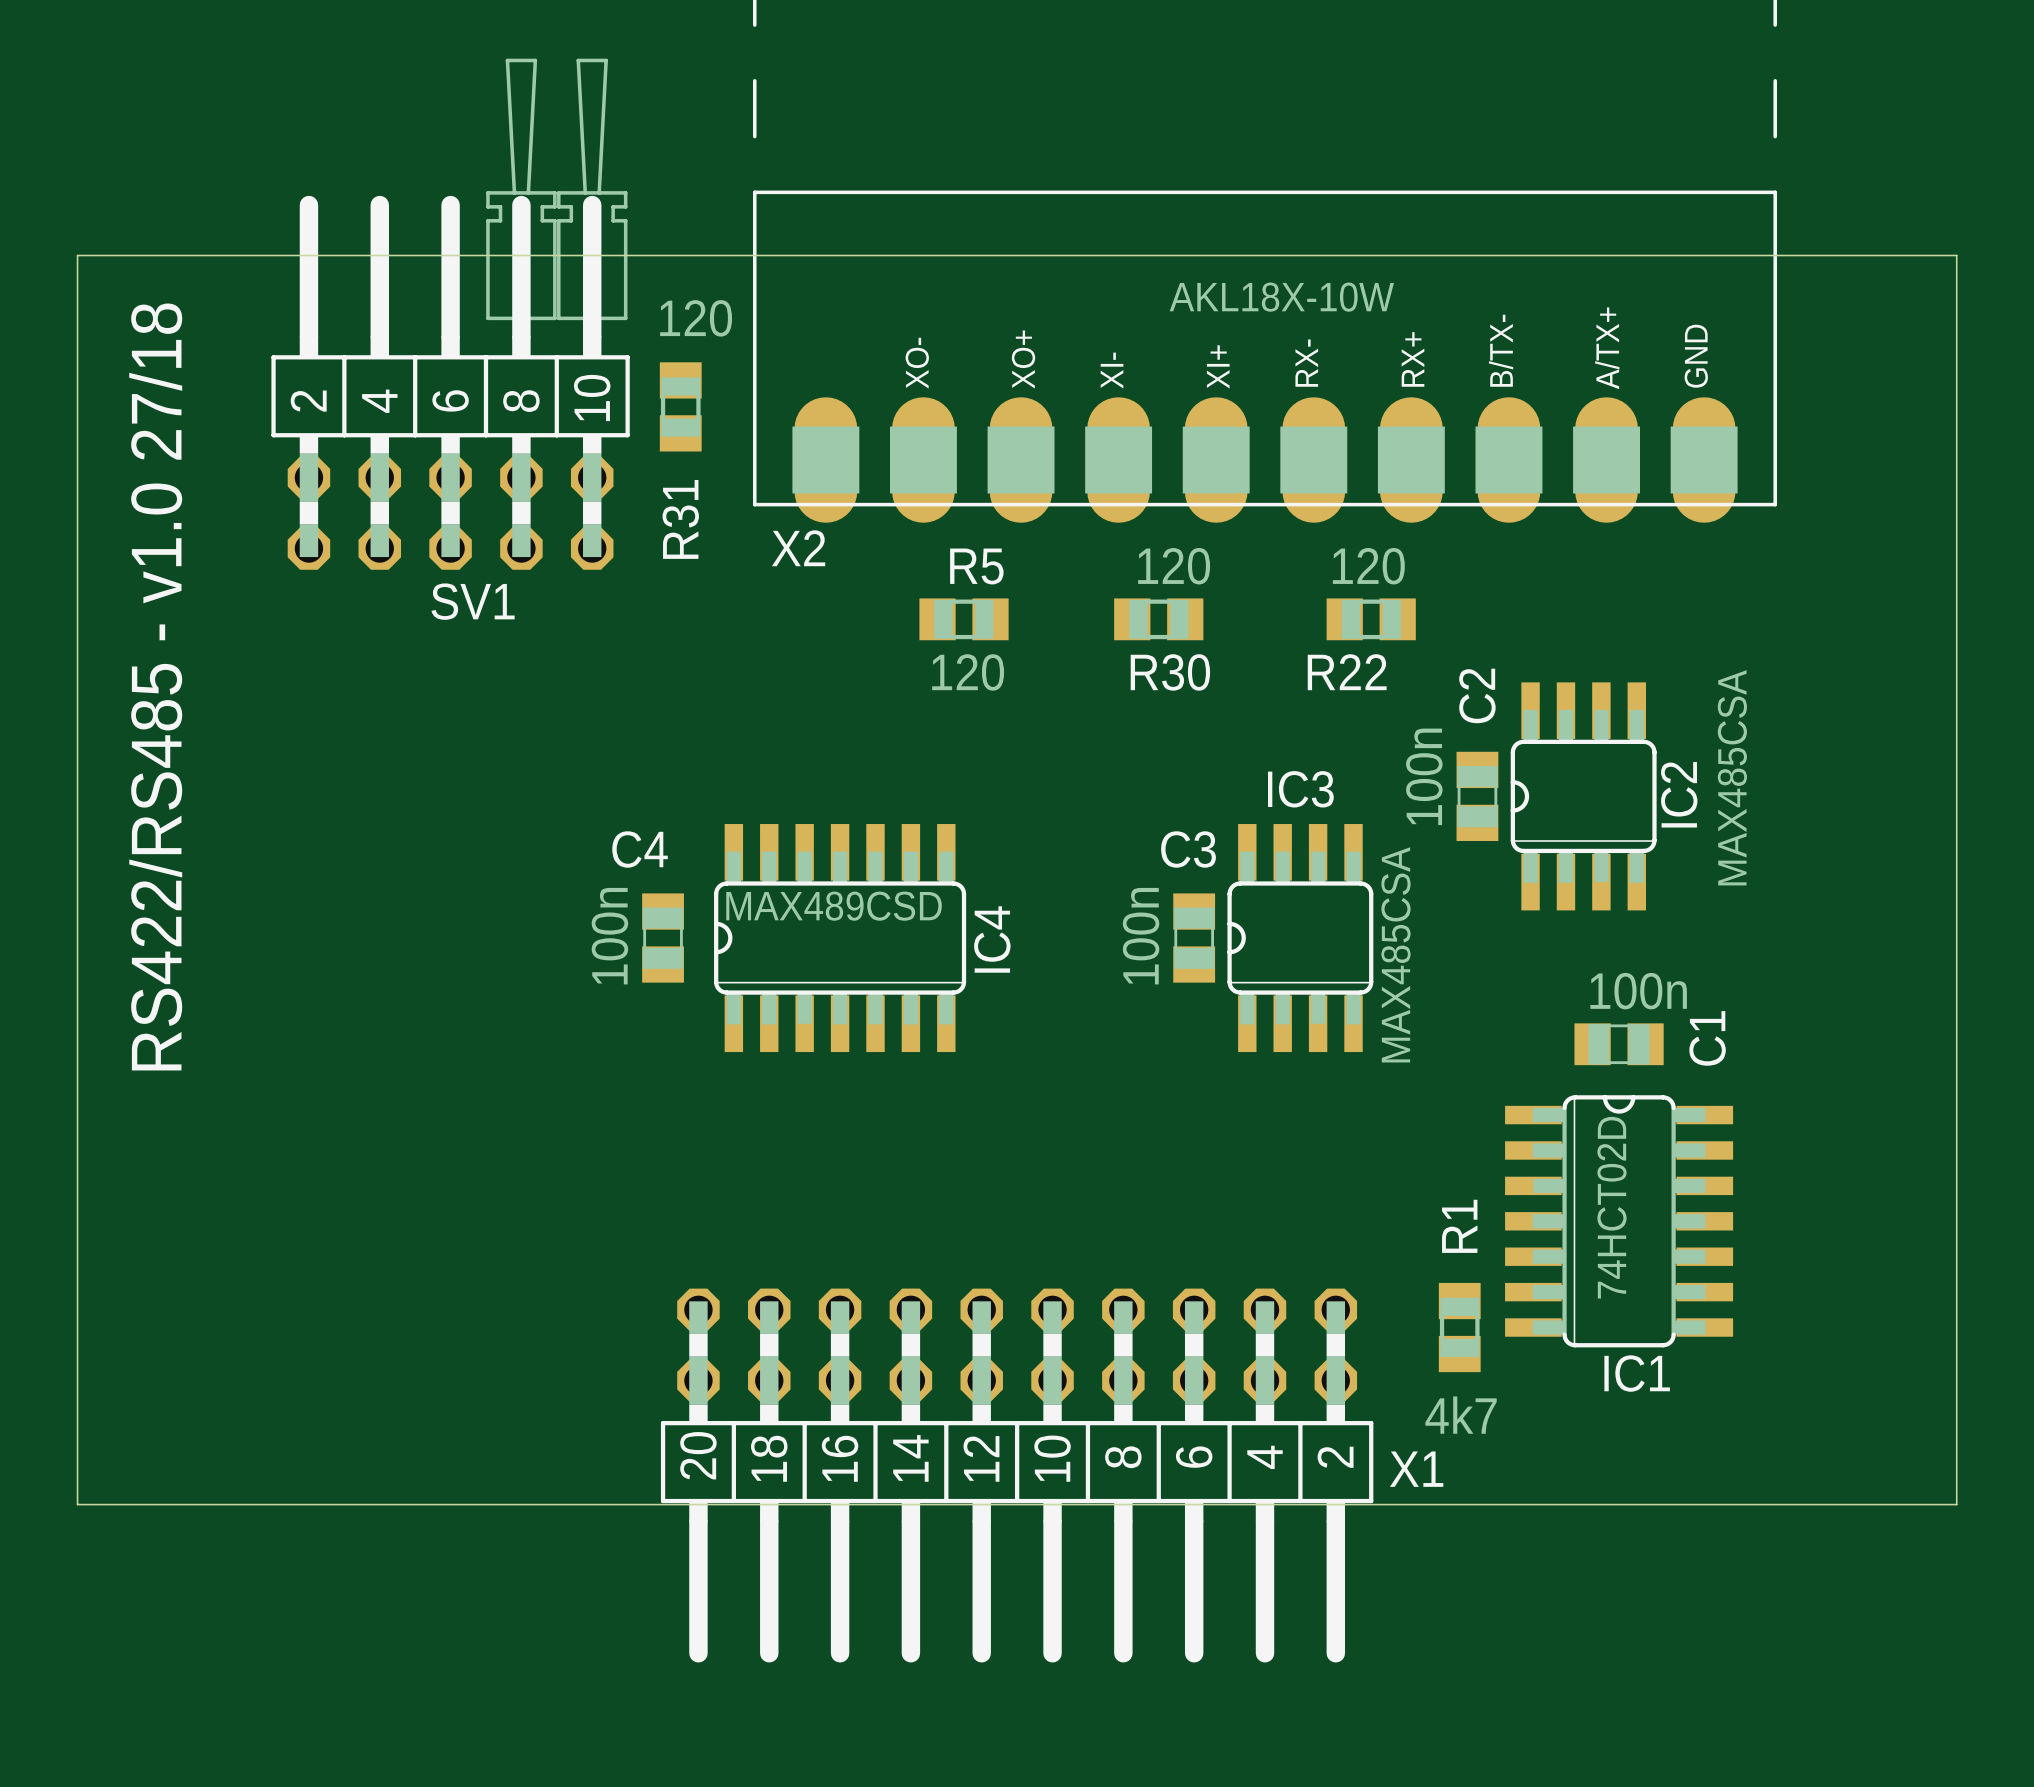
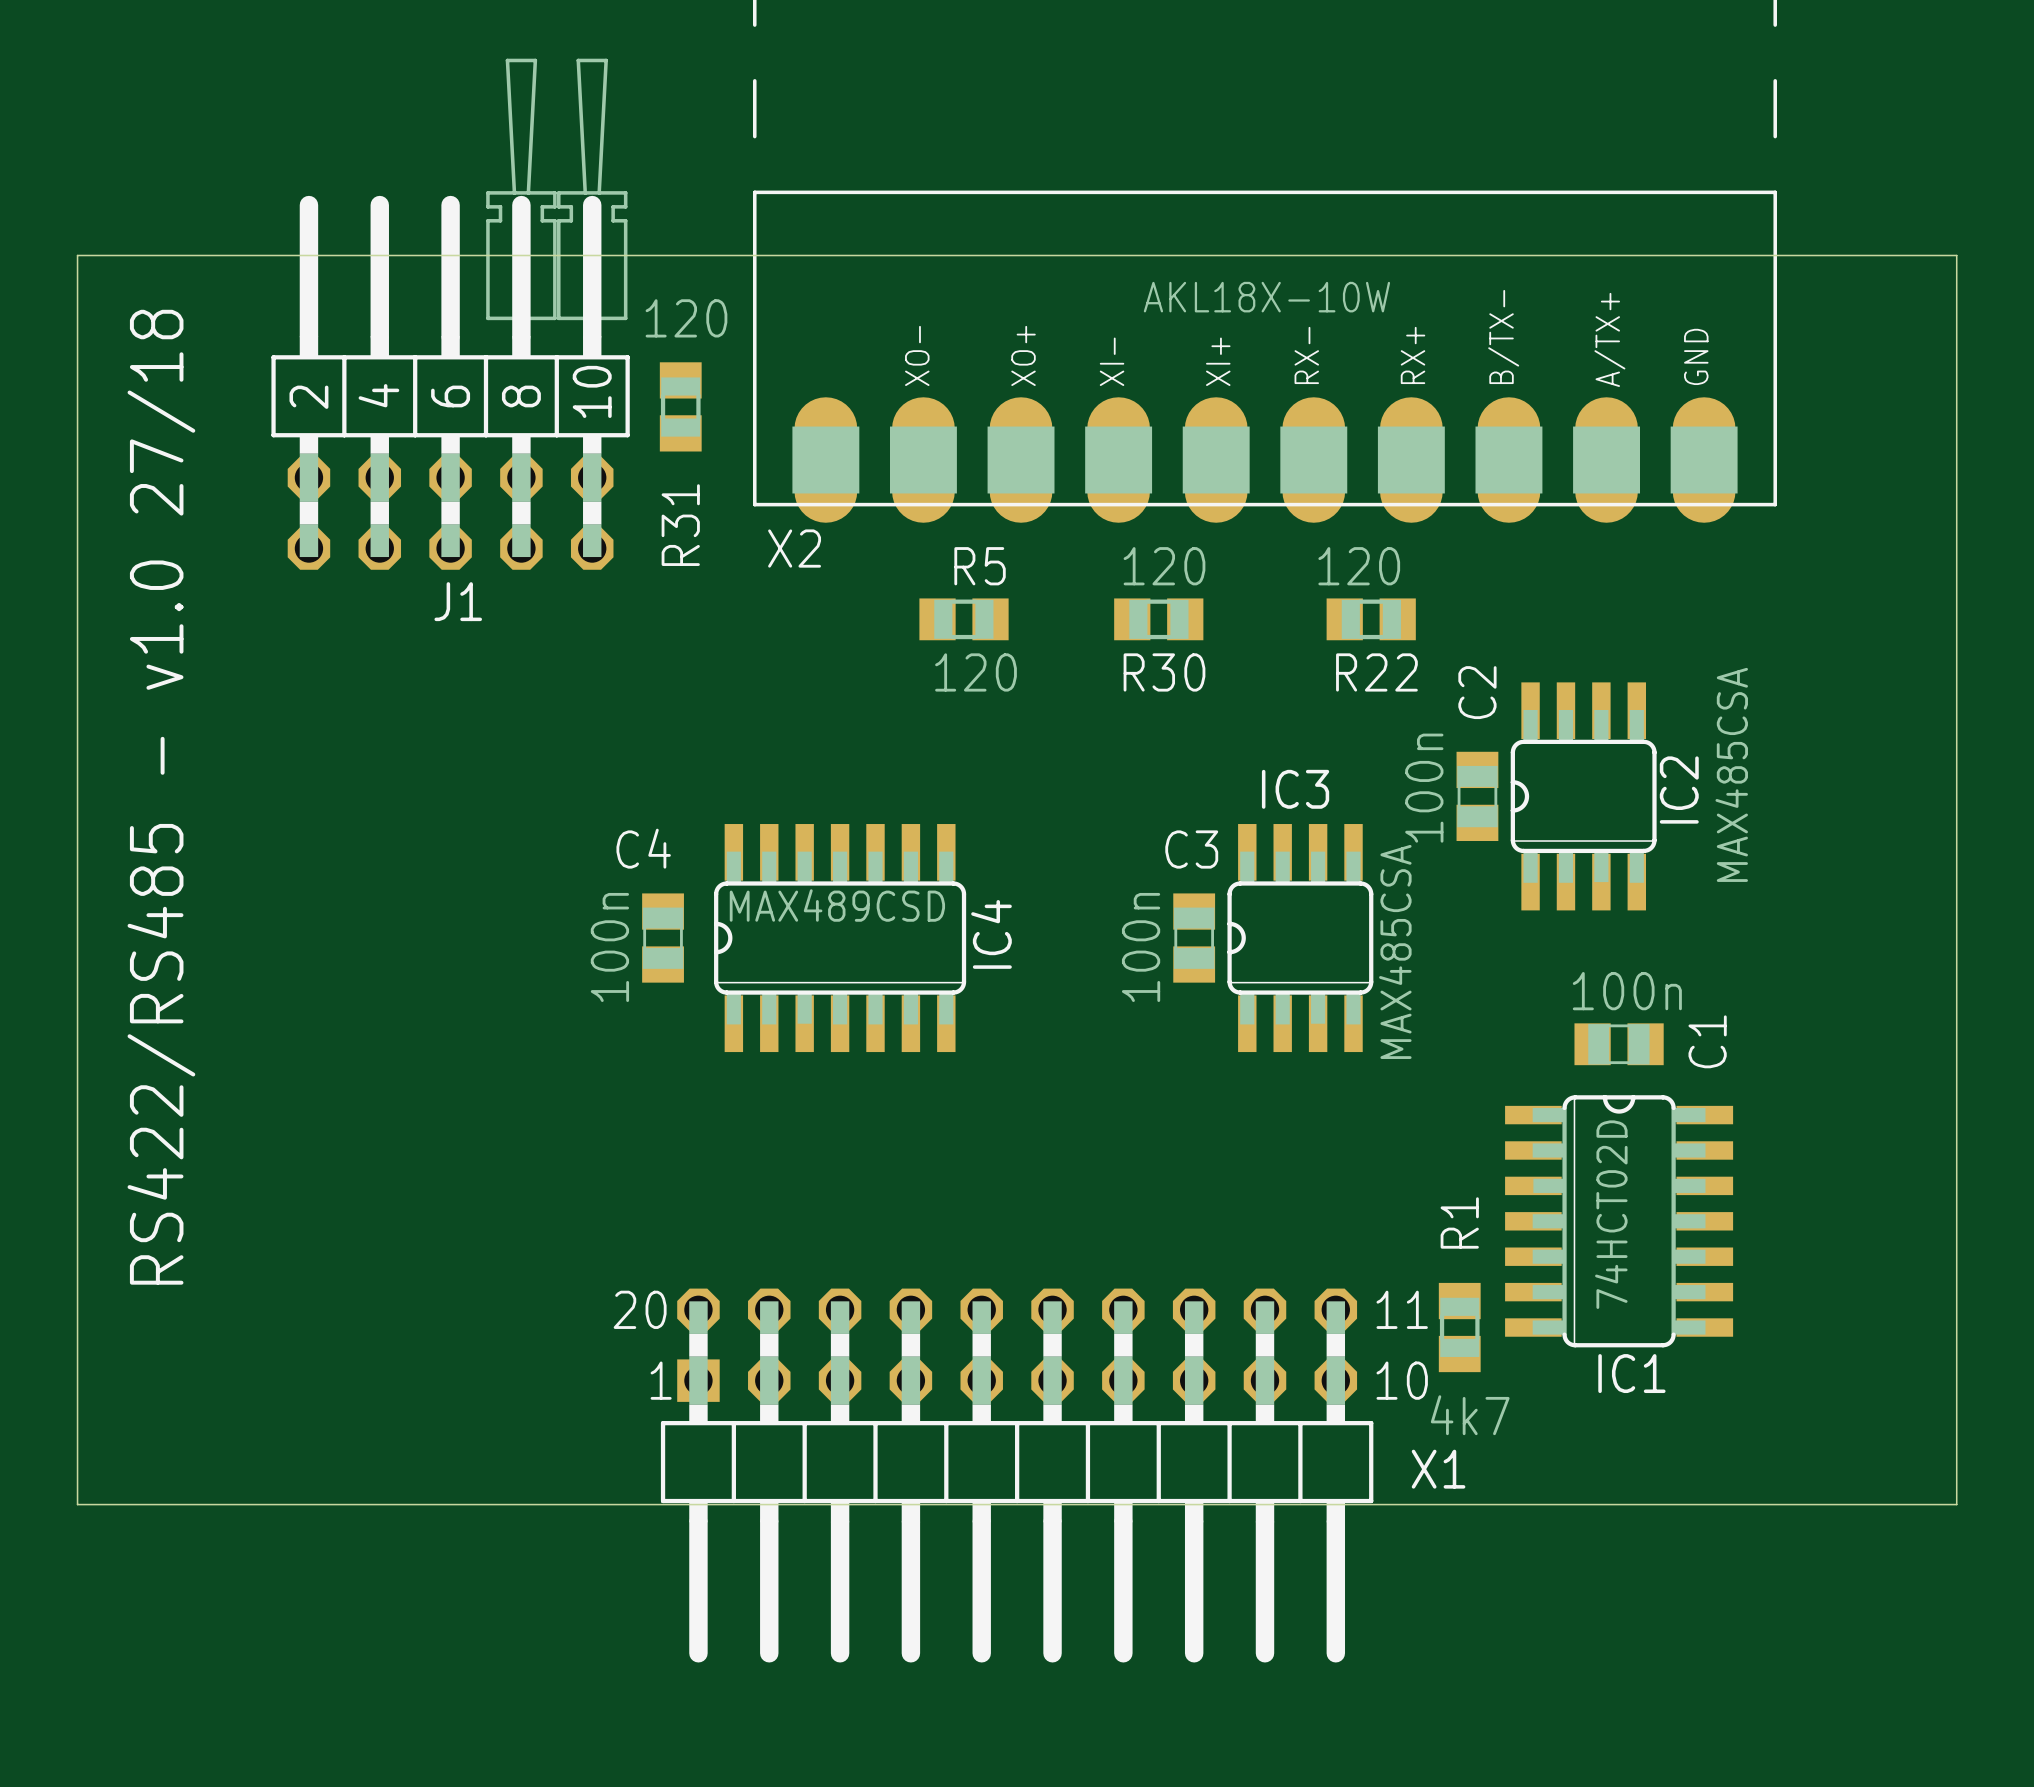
X1 footprint: [77, 255, 1957, 1663] -> [77, 255, 1957, 1663]
SV1 name: SV1 (473, 601) -> J1 (458, 601)
R22 name position: R22 (1347, 672) -> R22 (1376, 672)

